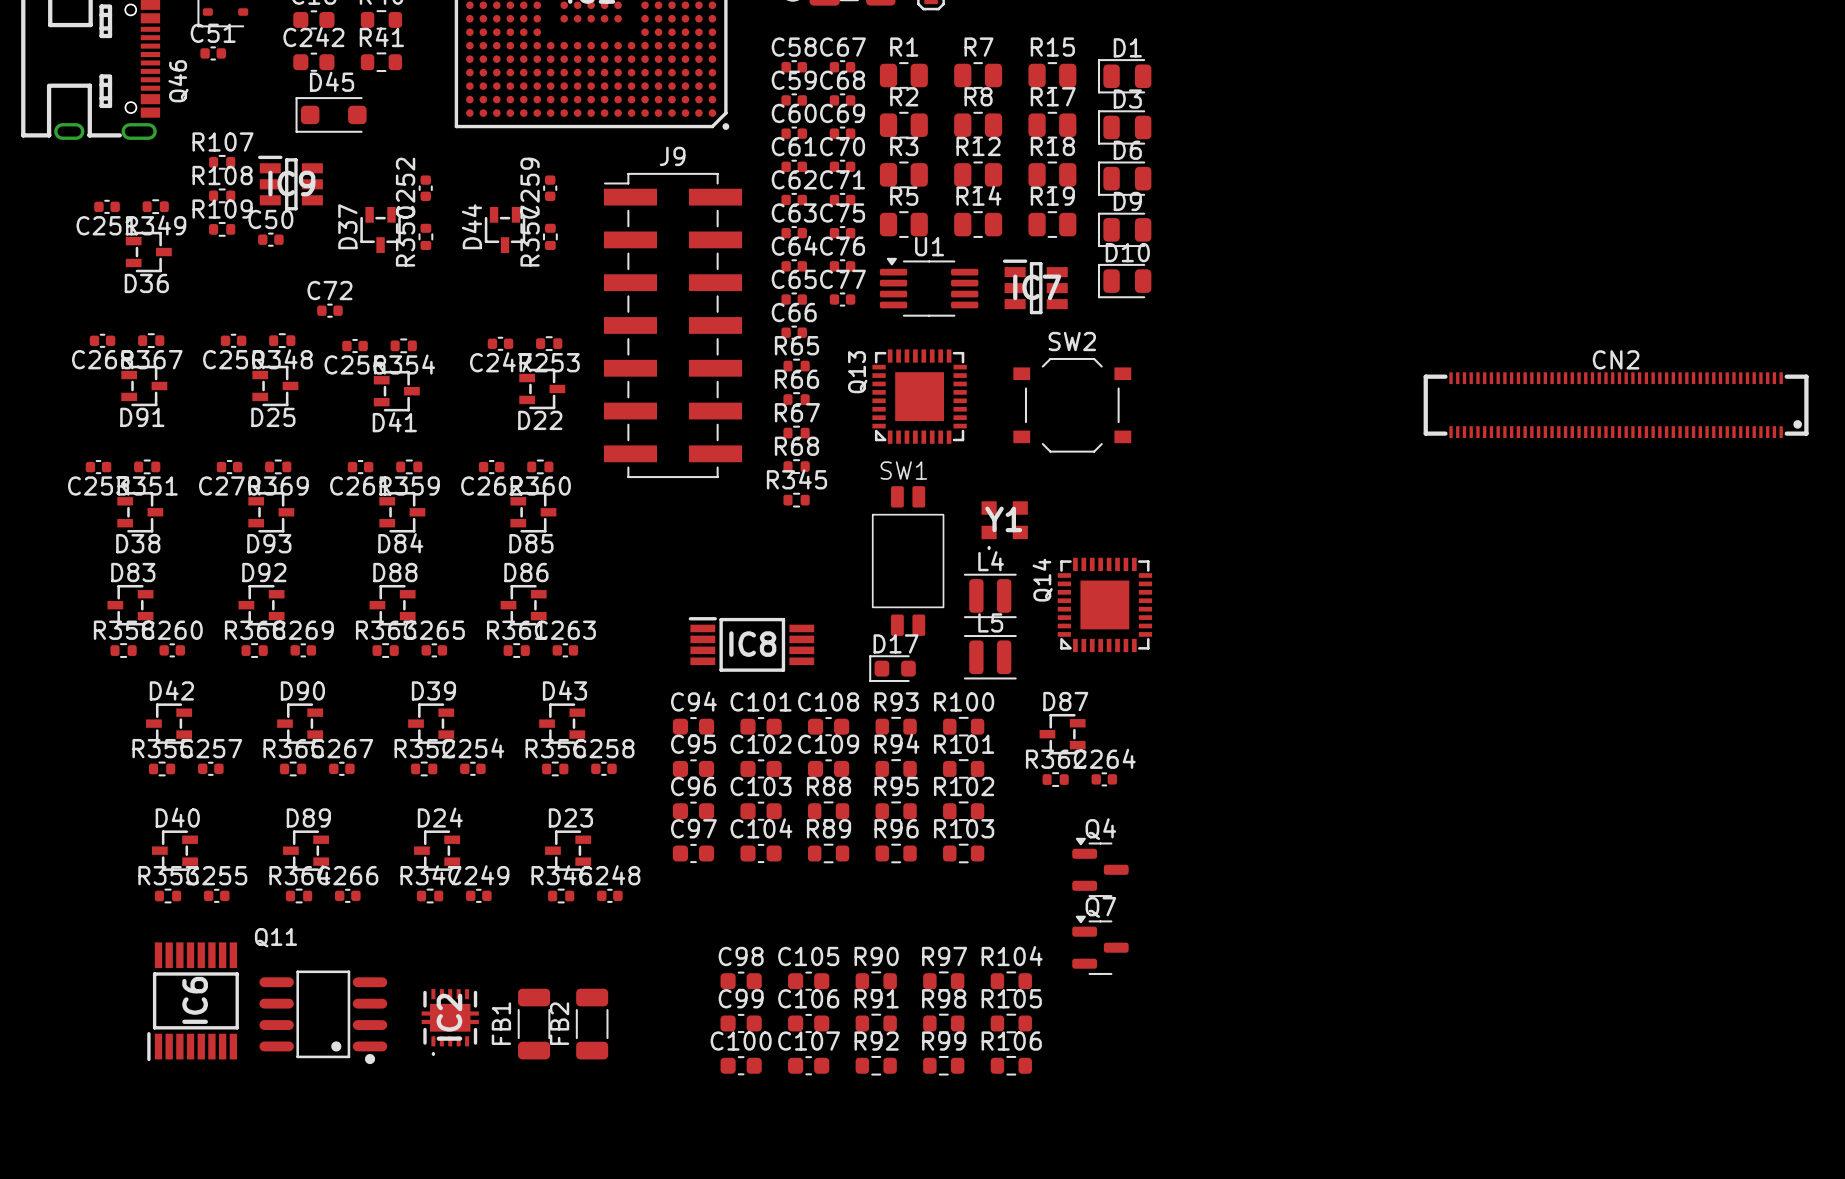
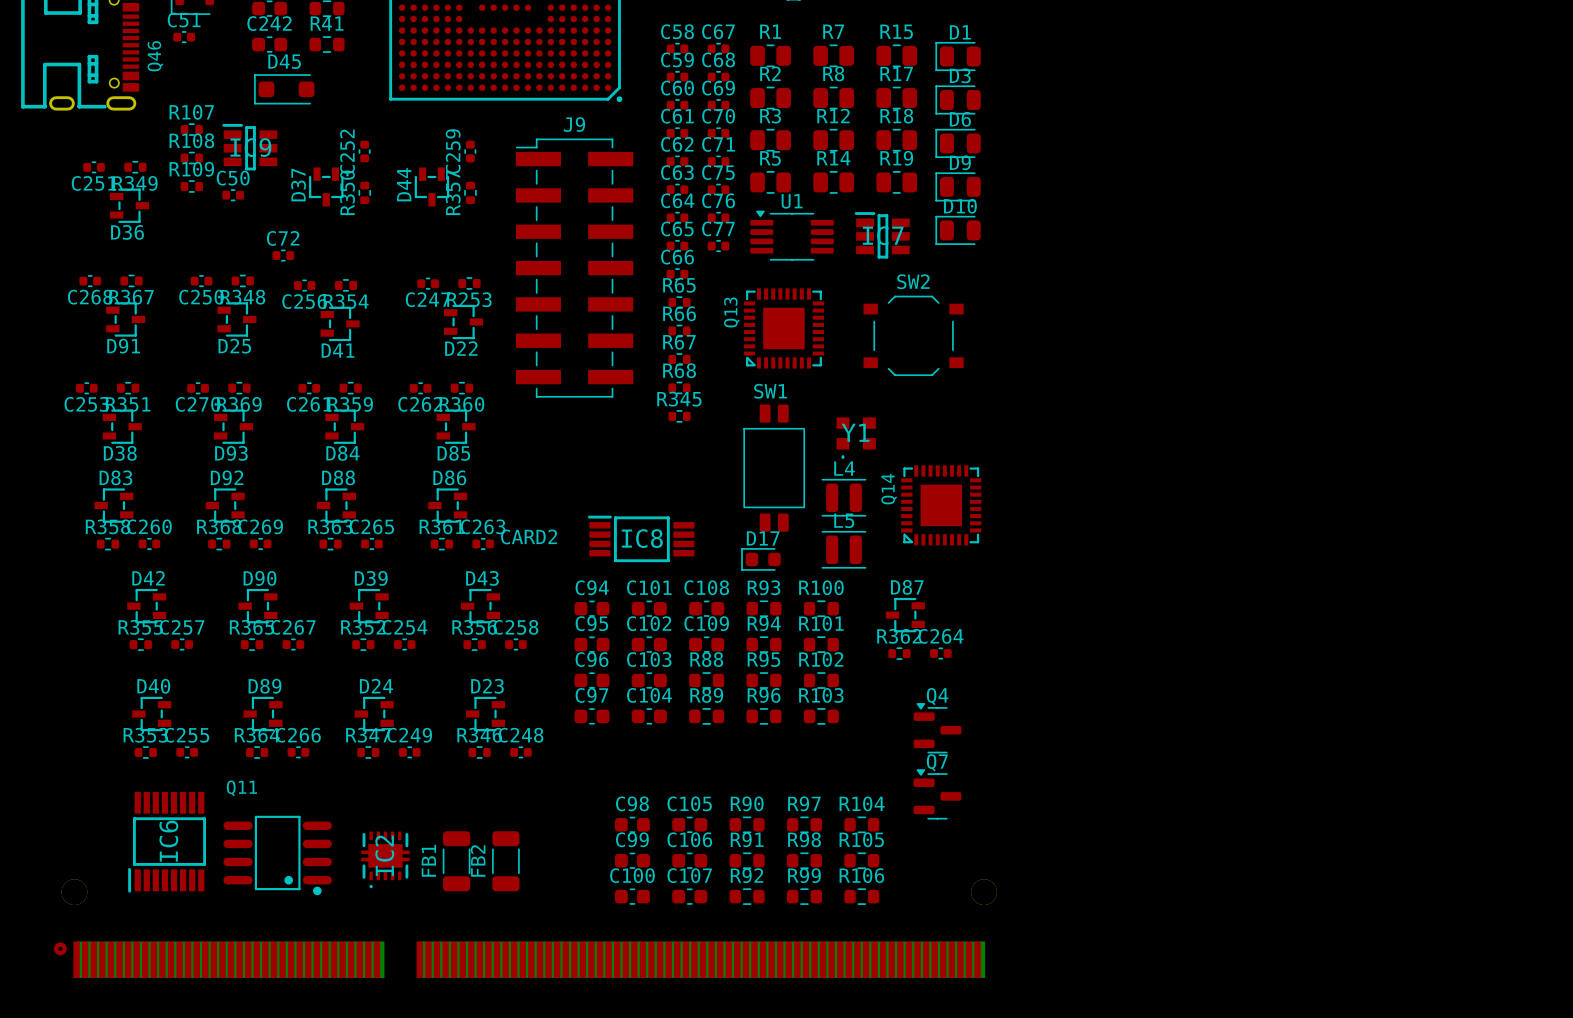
CN2: (1616, 405) -> none
CARD2: none -> (525, 928)

